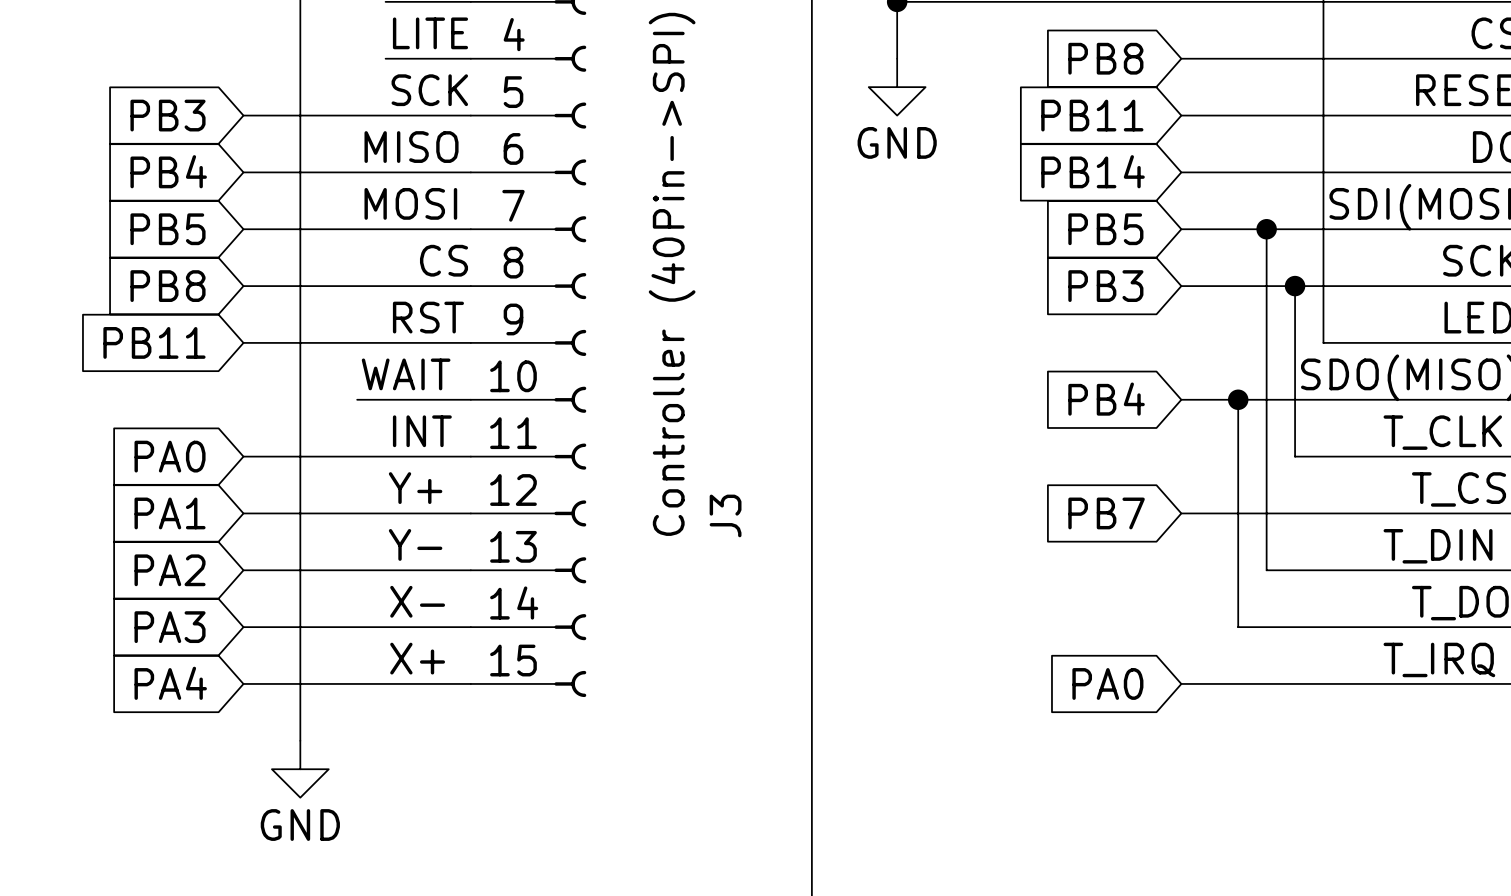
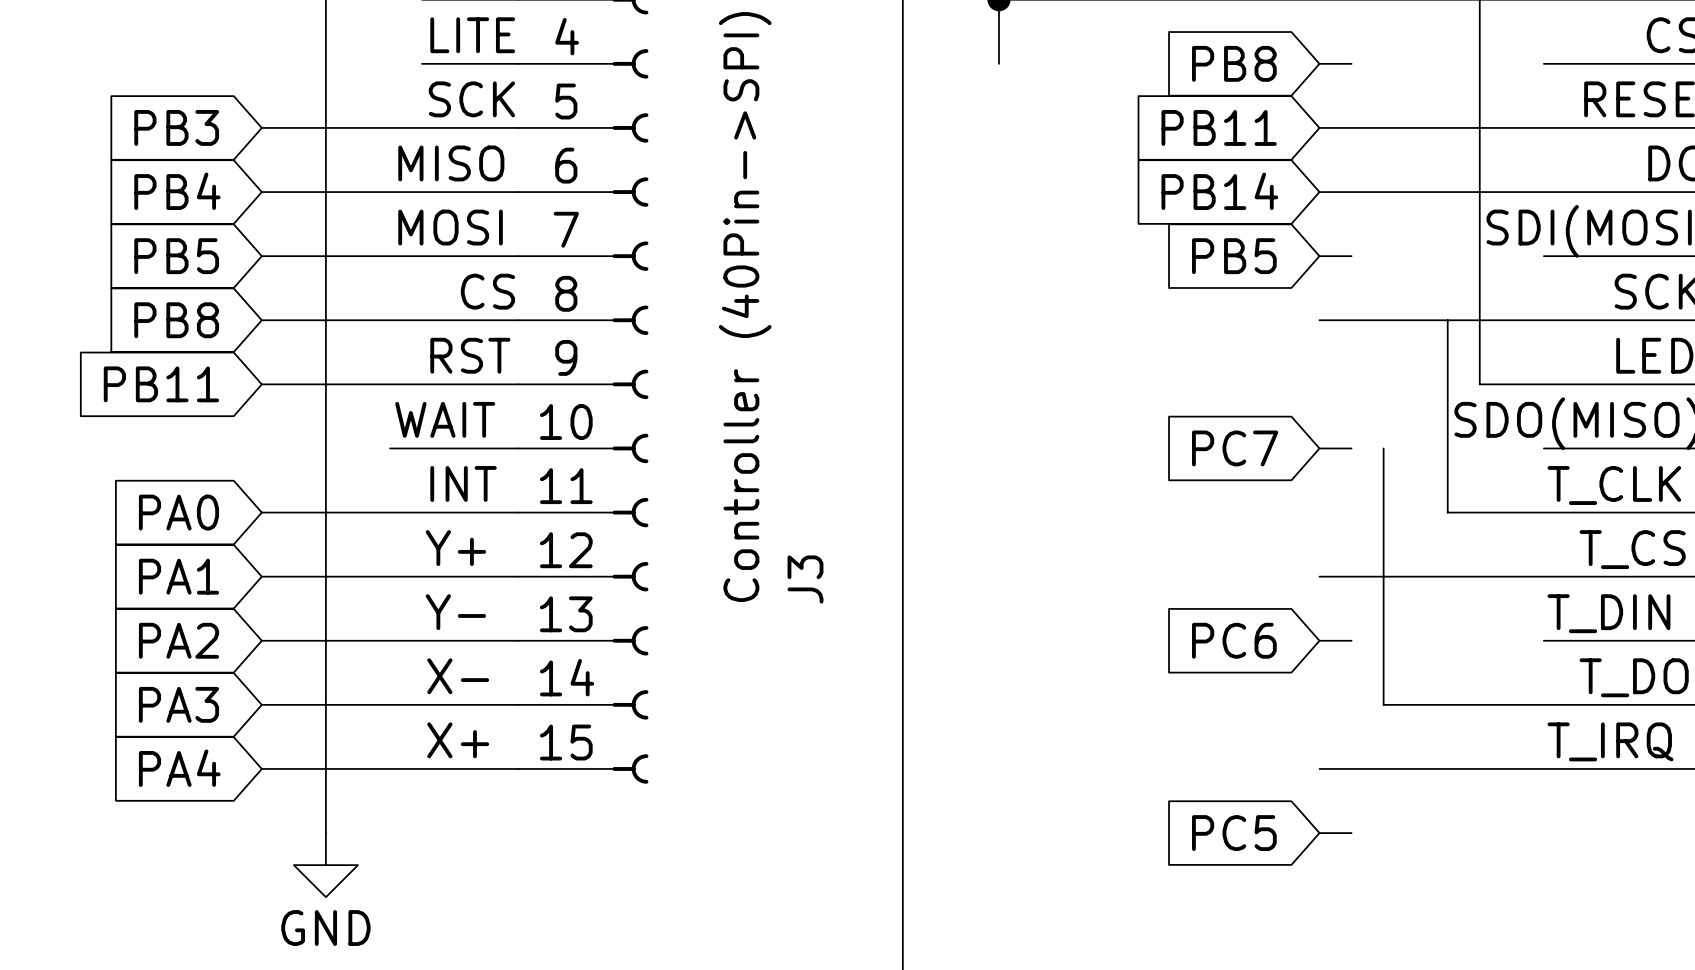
wire: (1209, 58) (1380, 58) -> none
power symbol: GND (897, 87) -> none
wire: (1209, 229) (1380, 229) -> none
wire: (1266, 229) (1266, 570) (1380, 570) -> none
junction: (1266, 229) -> none
global label: PB3 (1105, 286) -> none
junction: (1295, 286) -> none
global label: PB4 (1106, 399) -> PC7 (1235, 448)
wire: (1209, 399) (1380, 399) -> none
junction: (1238, 399) -> none
global label: PB7 (1106, 513) -> none
global label: none -> PC6 (1234, 640)
wire: none -> (1319, 640) (1351, 640)
global label: PA0 (1107, 683) -> none
global label: none -> PC5 (1234, 833)
wire: none -> (1319, 833) (1351, 833)

